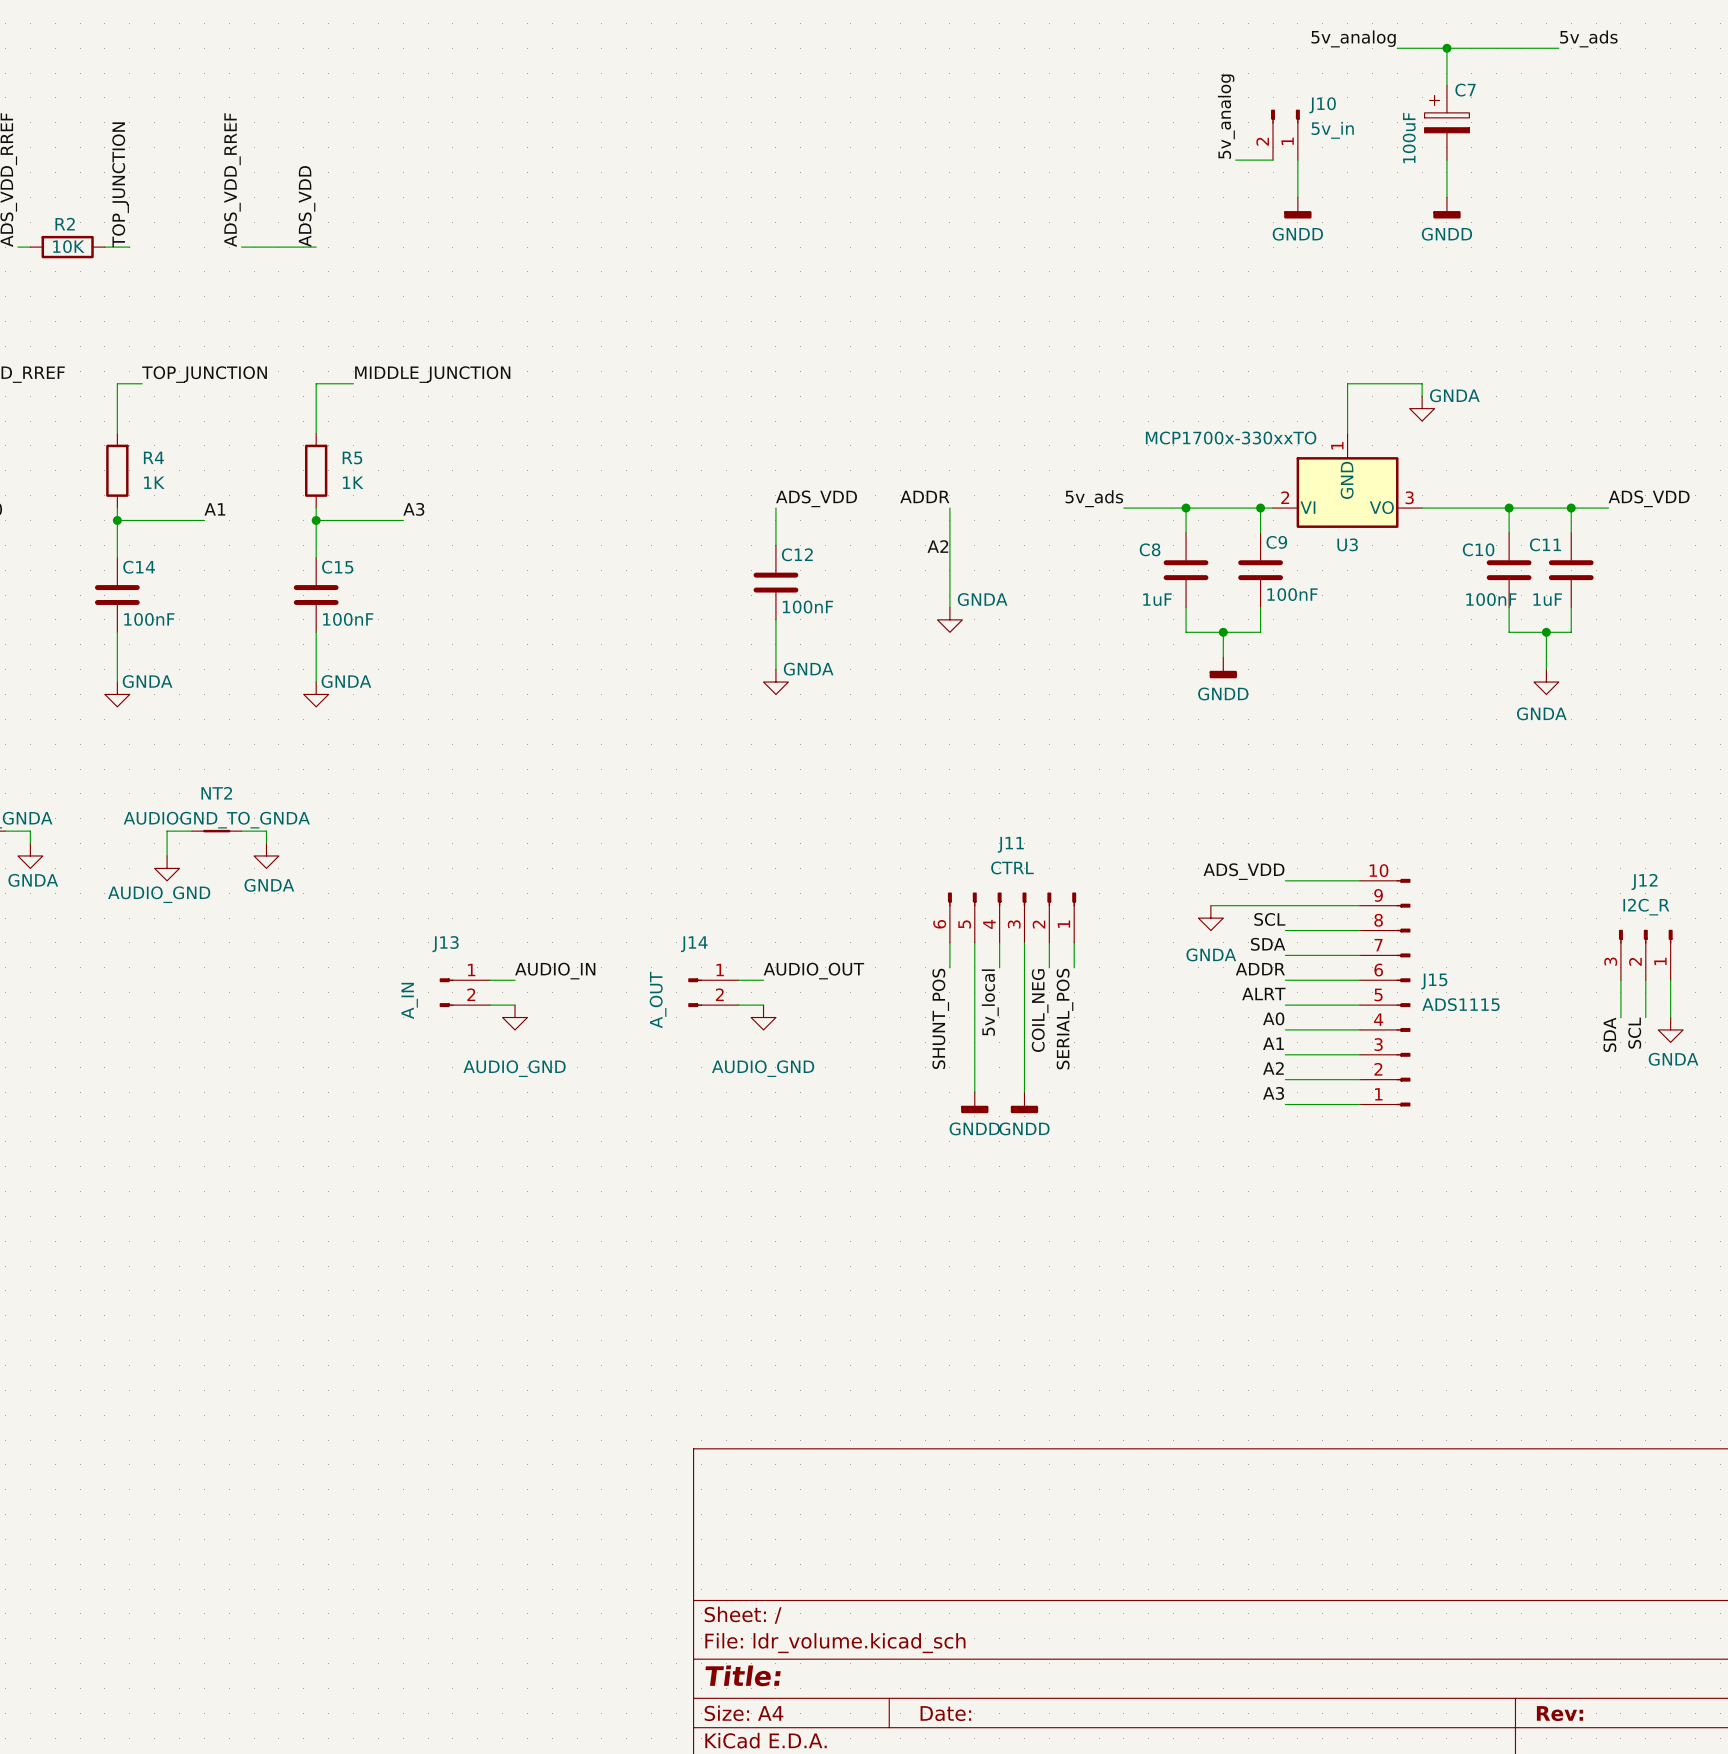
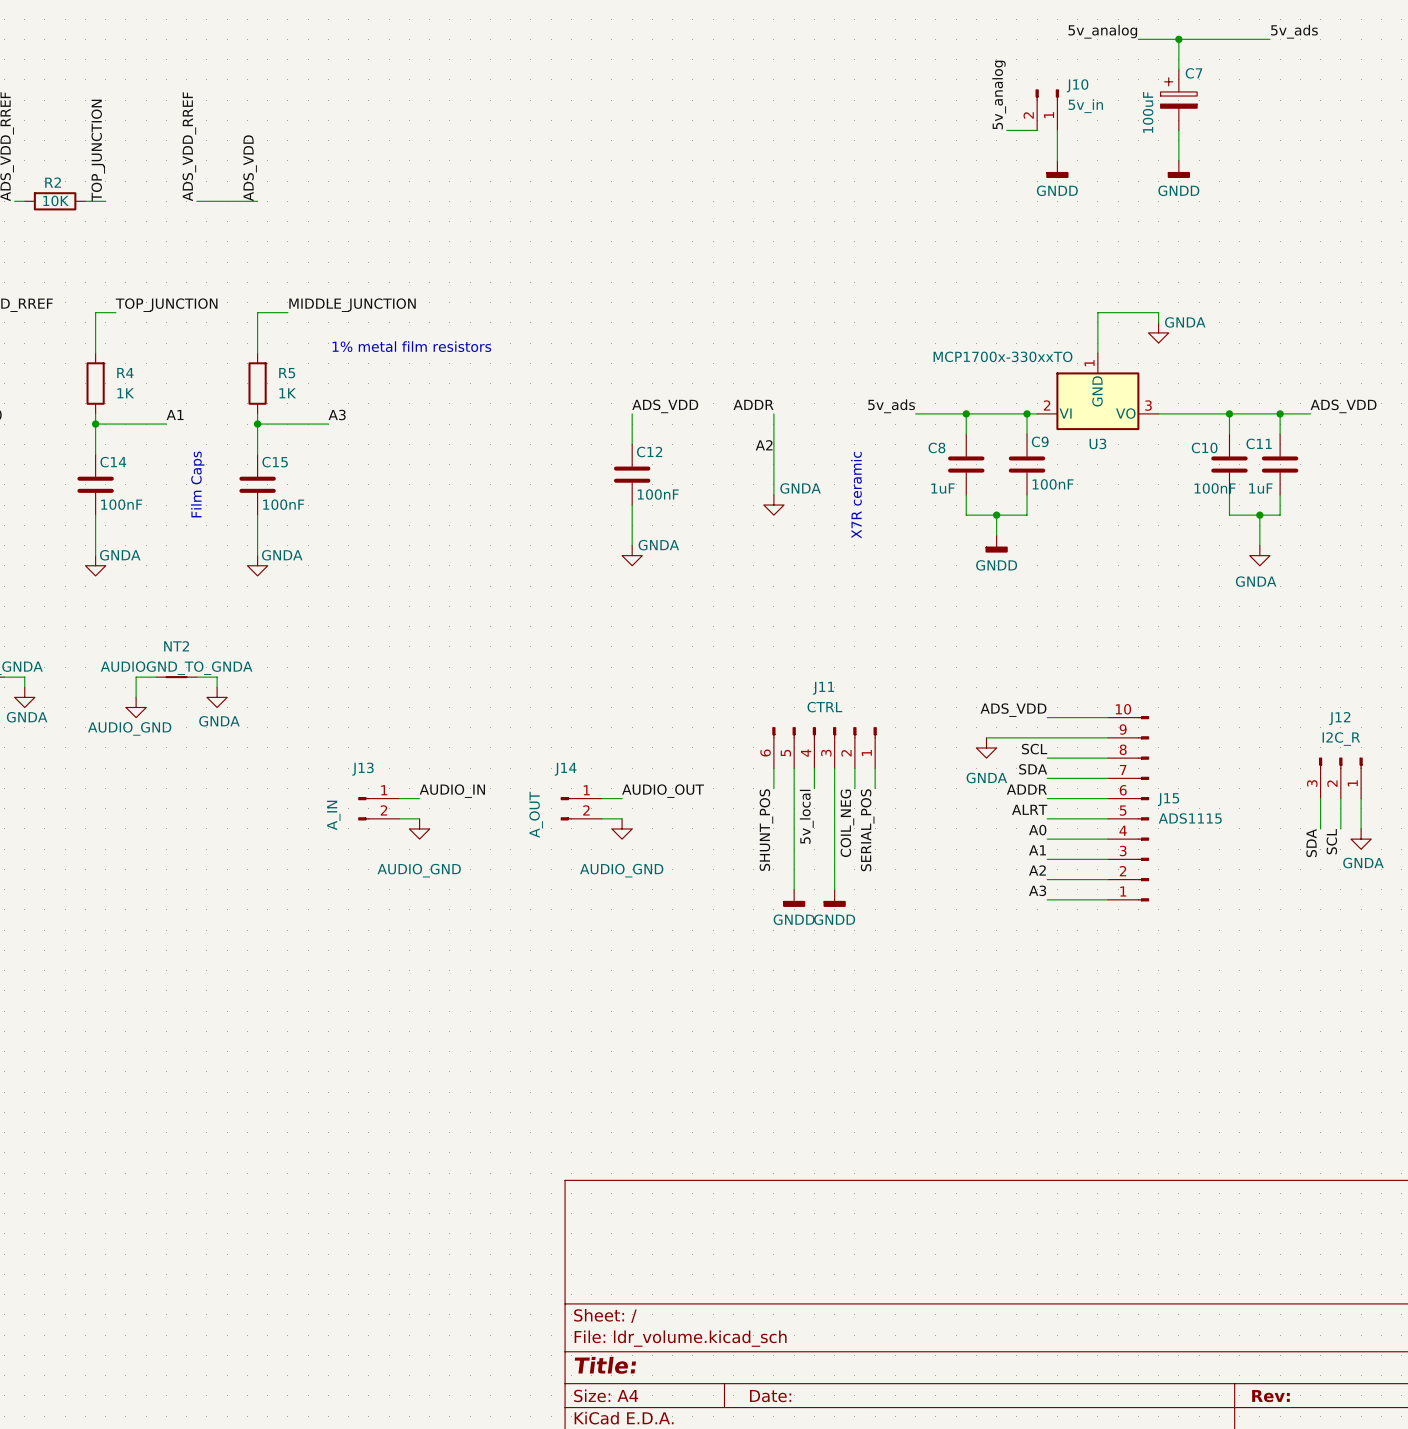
text: none -> 1% metal film resistors (411, 346)
text: none -> Film Caps (197, 484)
text: none -> X7R ceramic (856, 495)

